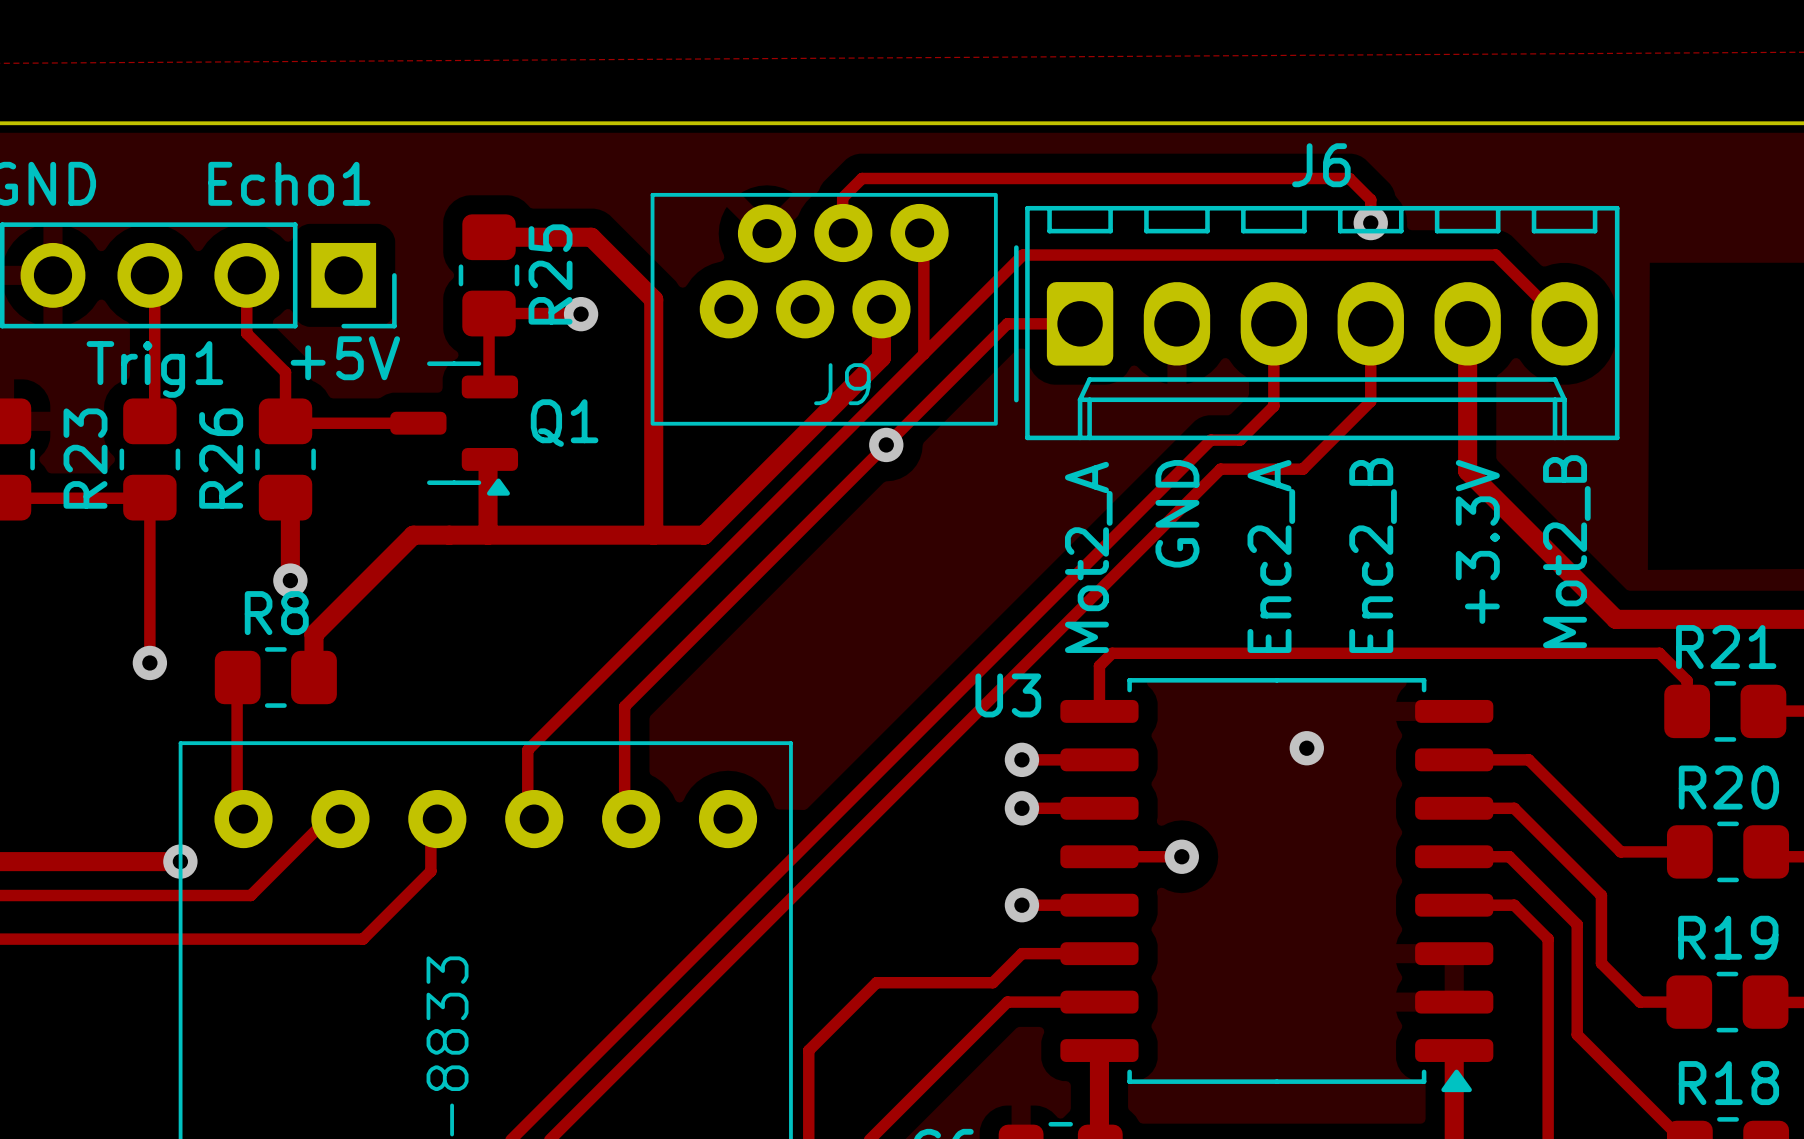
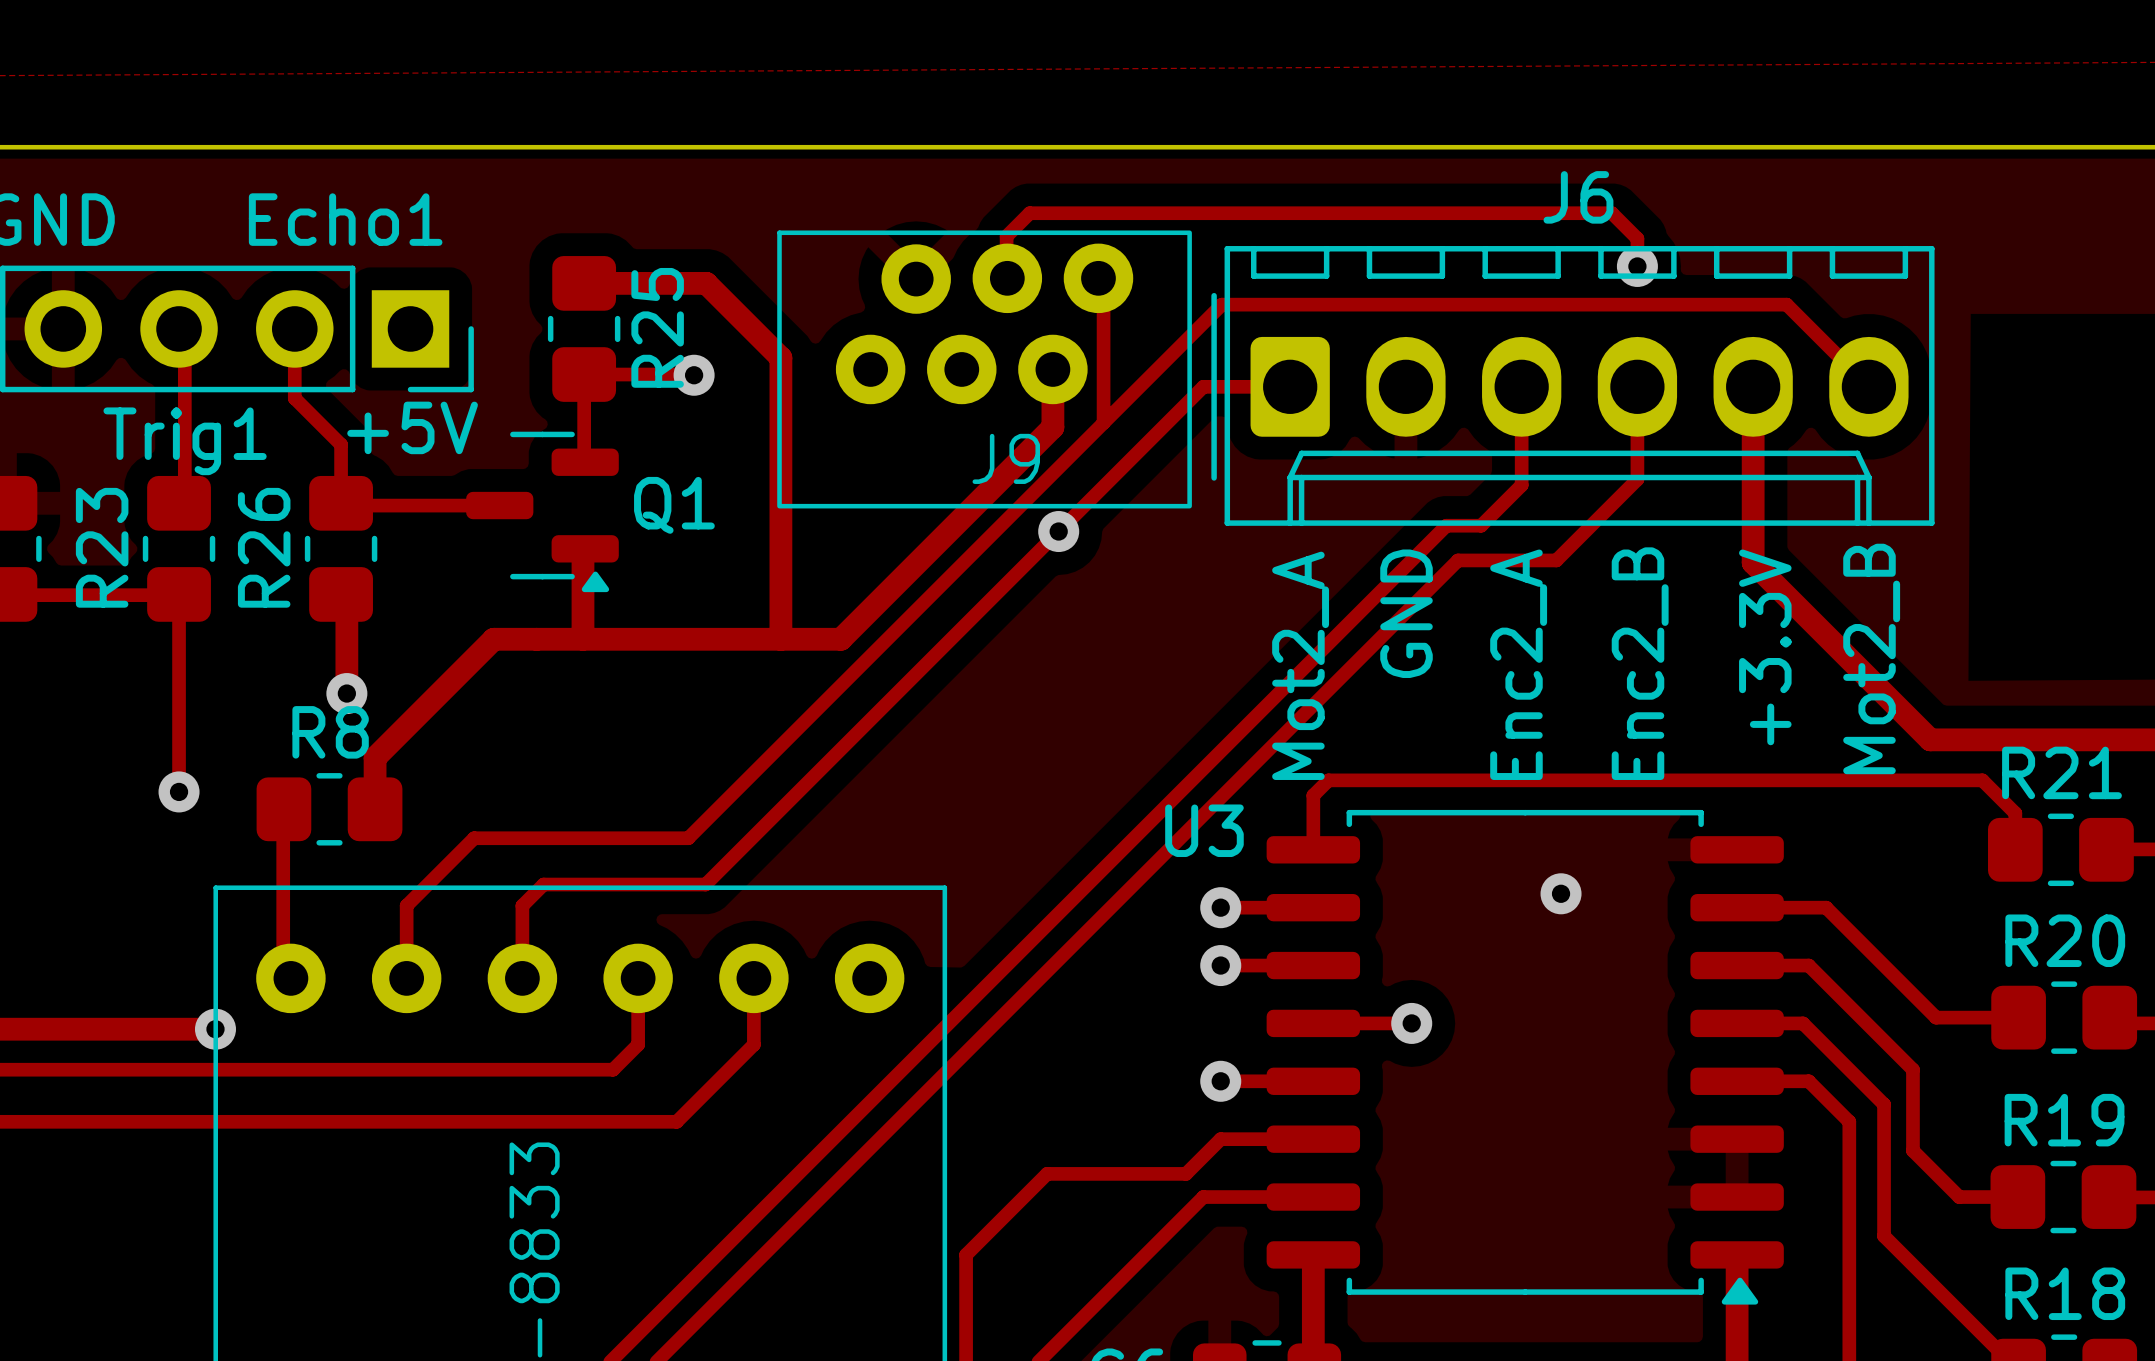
track: (576, 701) (527, 750) (527, 812) -> (688, 838) (474, 838) (406, 905) (406, 978)
track: (624, 706) (624, 812) -> (746, 844) (705, 884) (543, 884) (522, 905) (522, 978)
track: (333, 812) (250, 895) -> (646, 986) (638, 994) (638, 1044) (613, 1069) (299, 1069)
track: (430, 812) (430, 871) (363, 939) -> (762, 986) (753, 994) (753, 1044) (676, 1121) (433, 1121)

